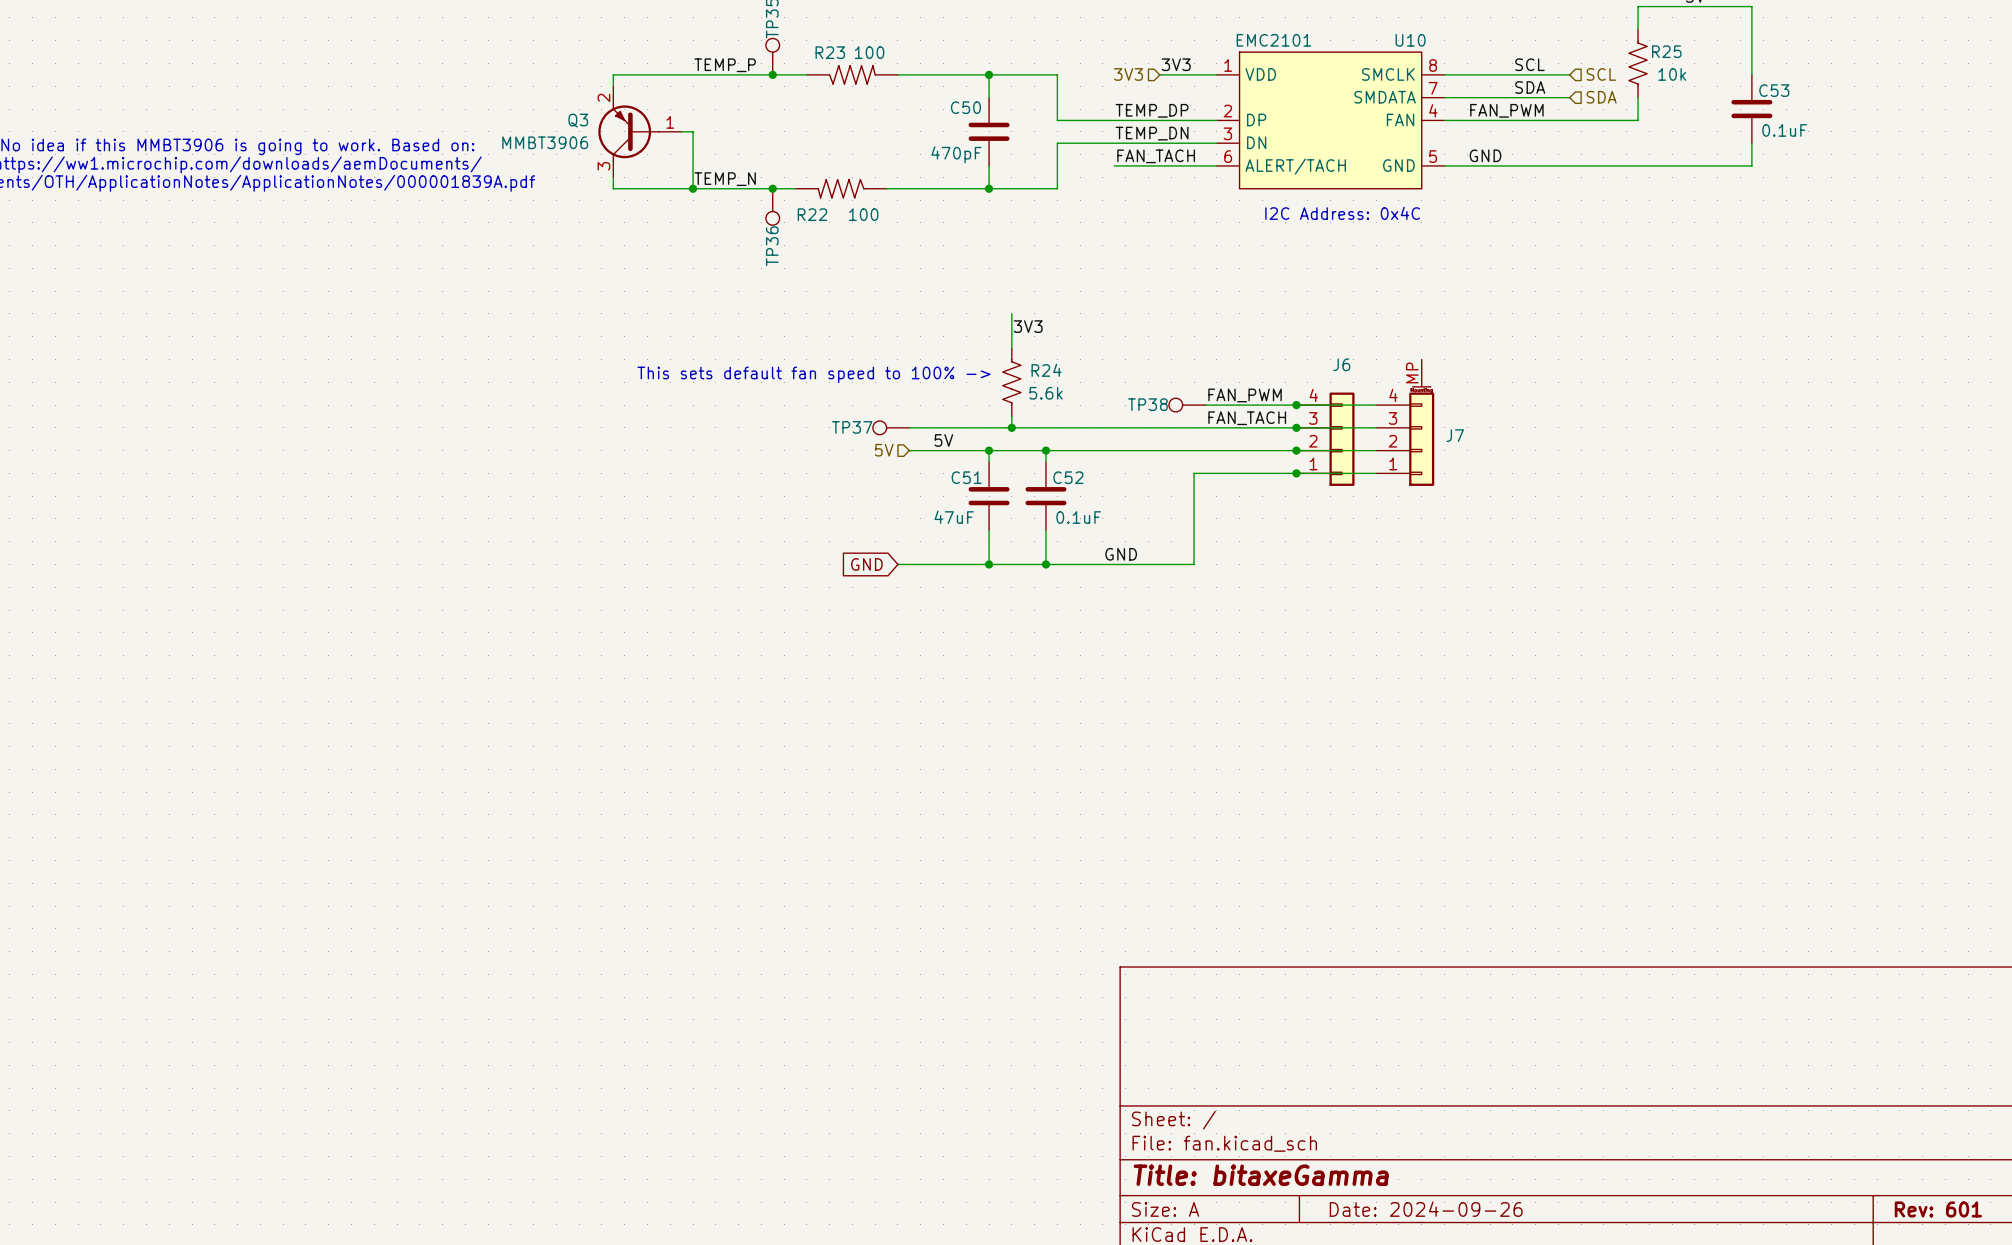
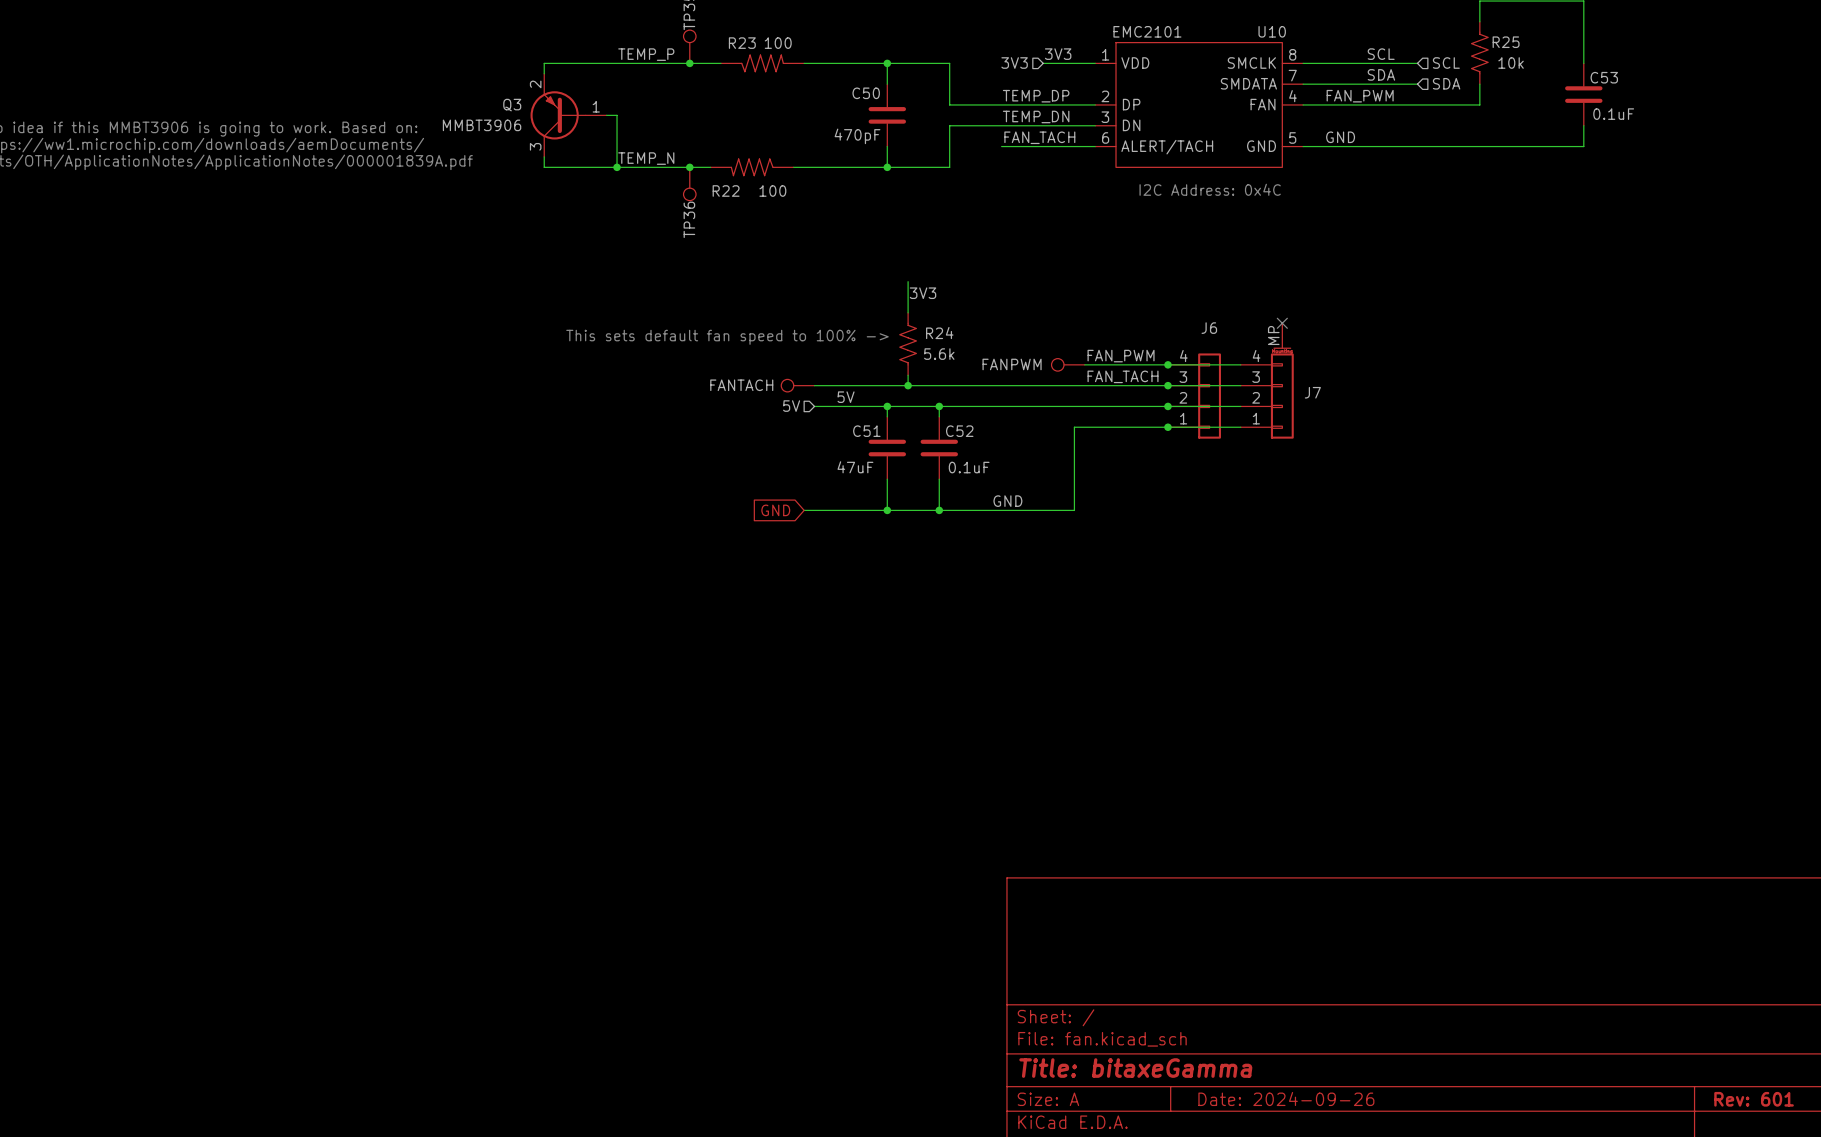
no-connect mark: none -> (1282, 323)
TP38 name: TP38 (1147, 404) -> FANPWM (1012, 364)
TP37 name: TP37 (852, 427) -> FANTACH (741, 385)

